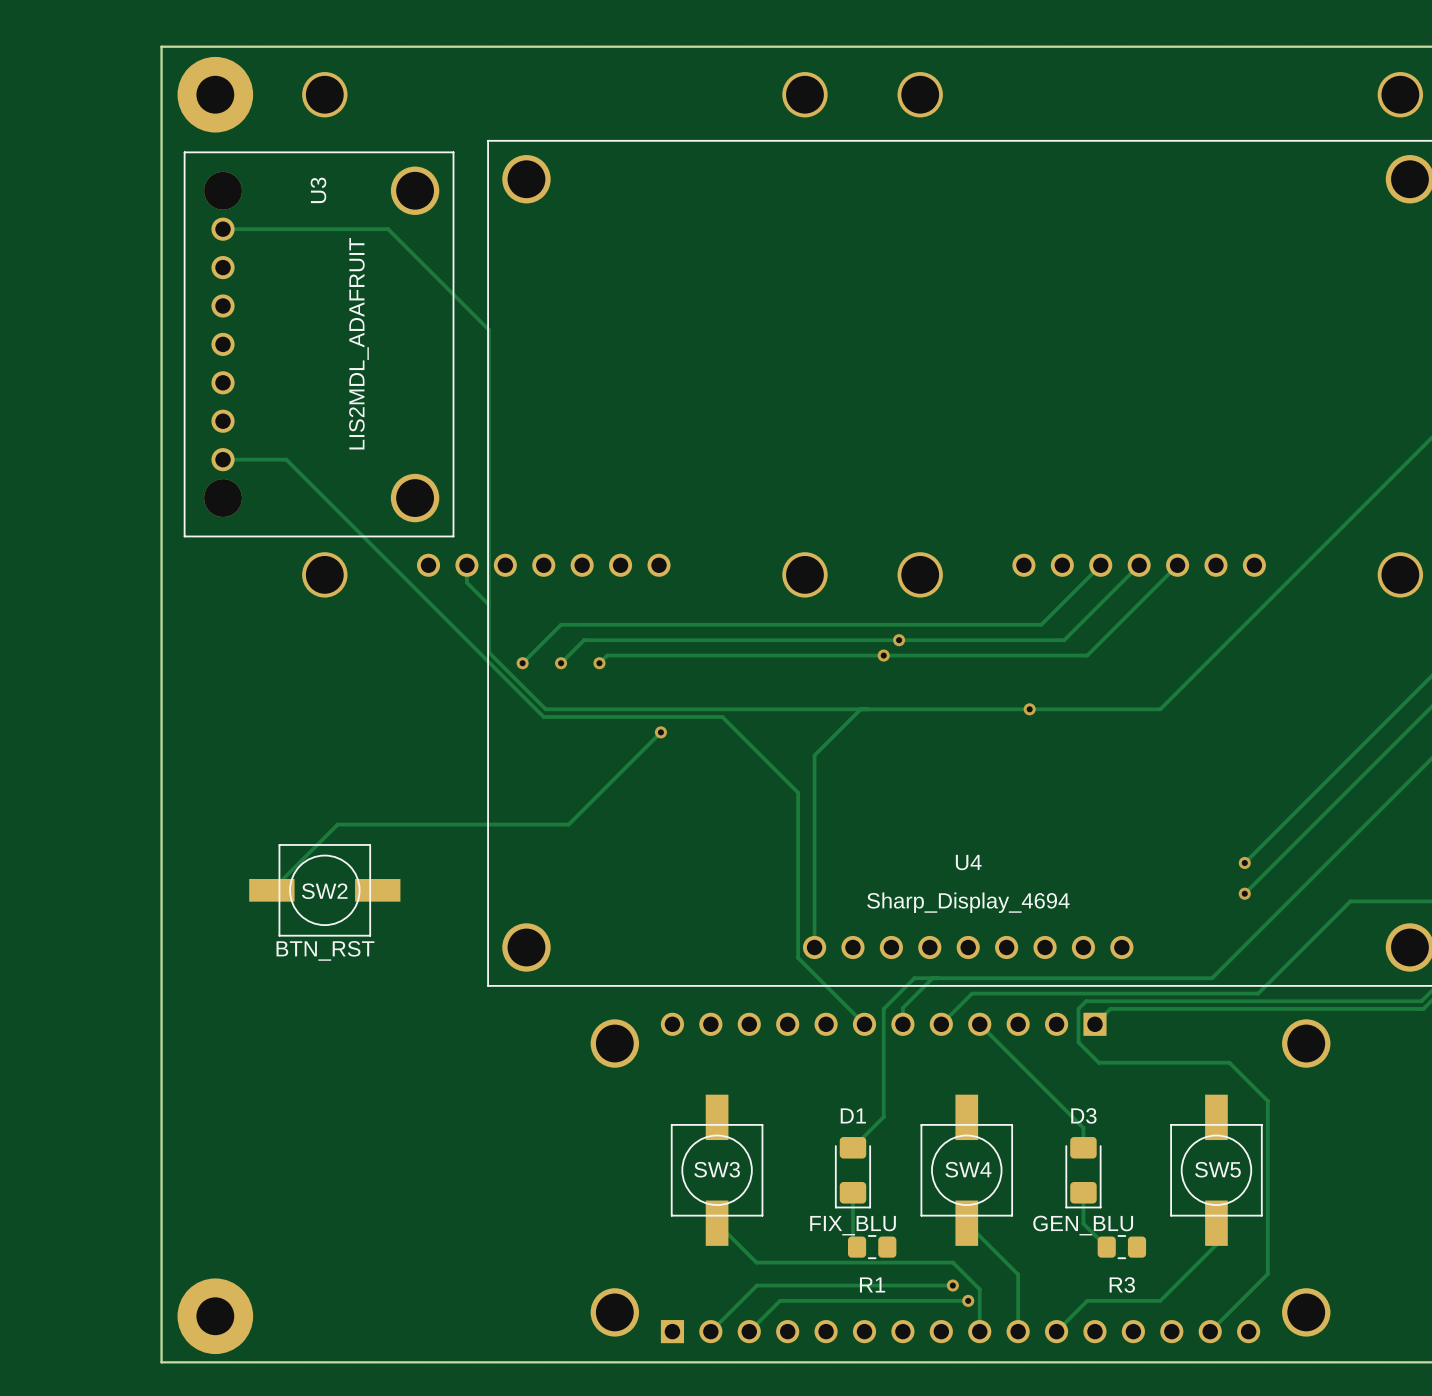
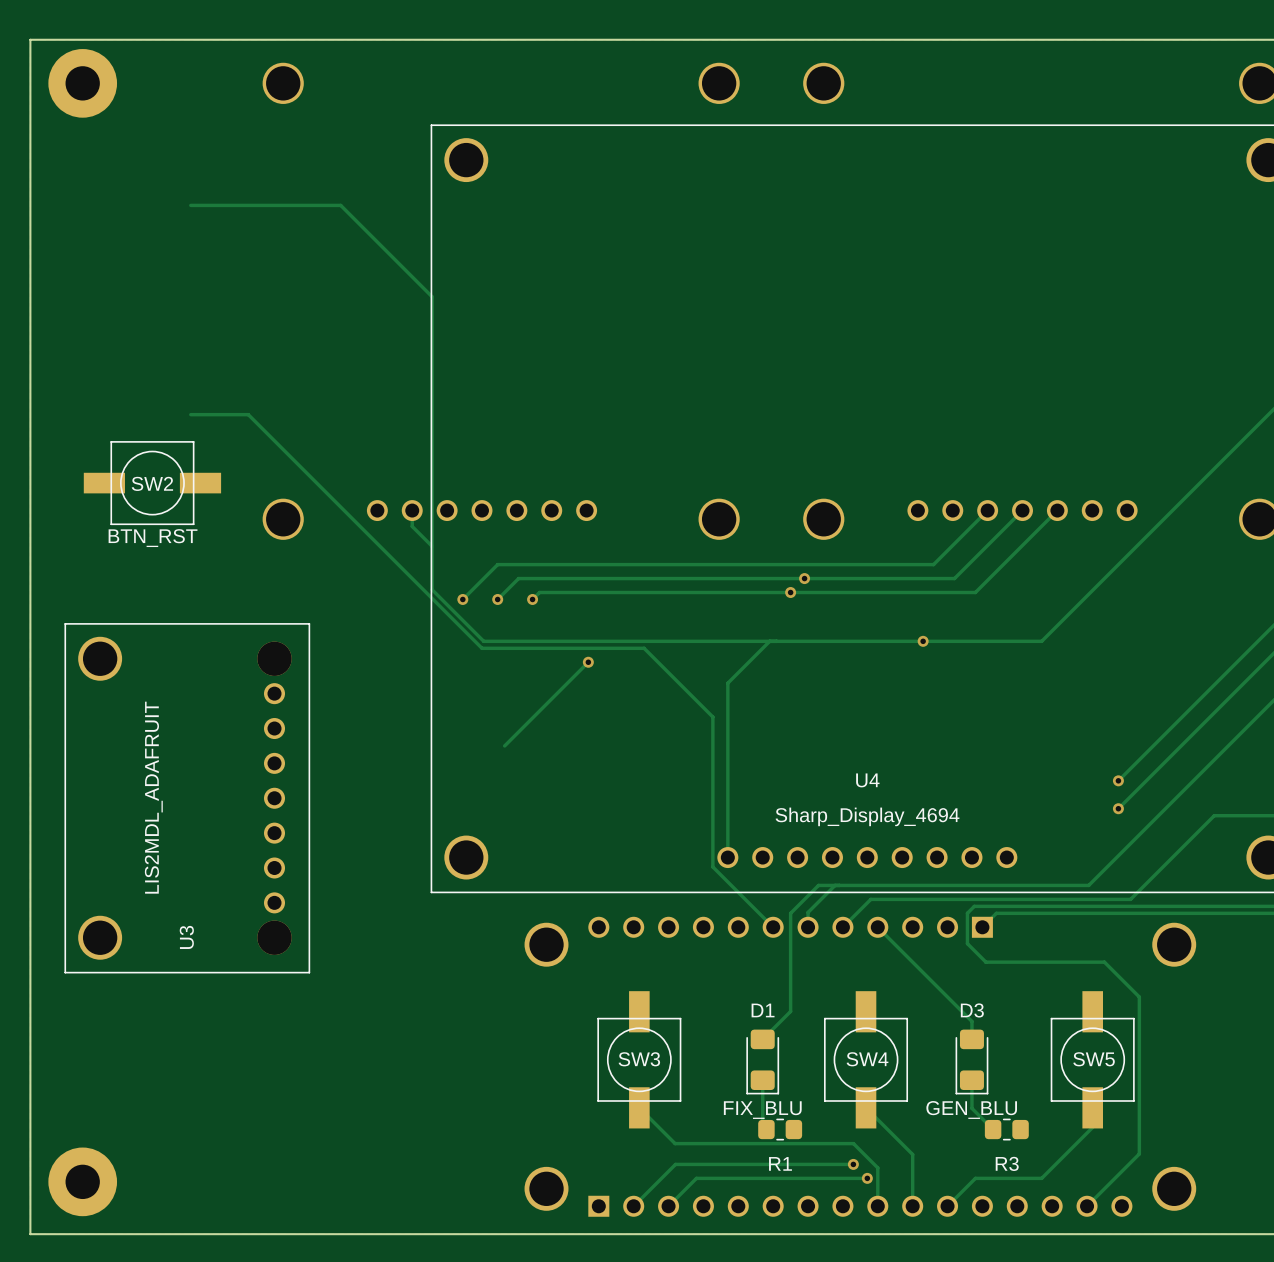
board edge: (161, 46) (161, 1362) -> (135, 39) (30, 39) (30, 1234) (135, 1234)
part position: (215, 94) -> (82, 83)
U3 rotation: 0° (319, 344) -> 180° (187, 798)
U3 position: (319, 344) -> (187, 798)
track: (568, 824) (337, 824) (271, 890) -> none
SW2 position: (324, 890) -> (152, 483)
part position: (215, 1316) -> (82, 1181)

